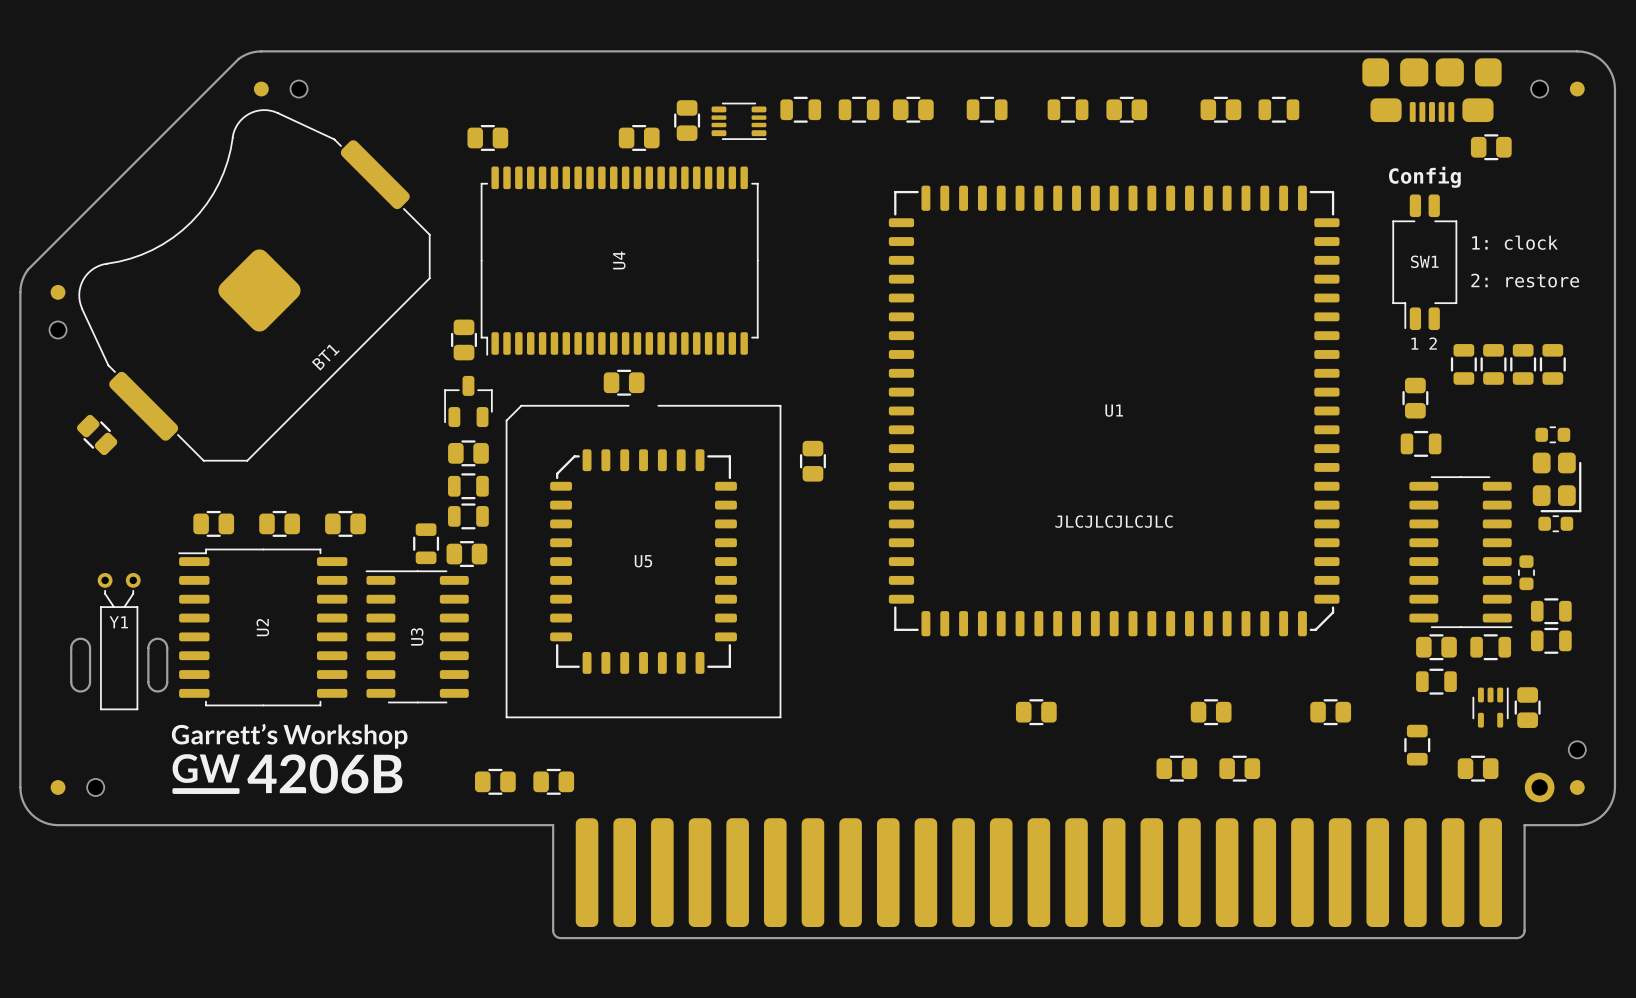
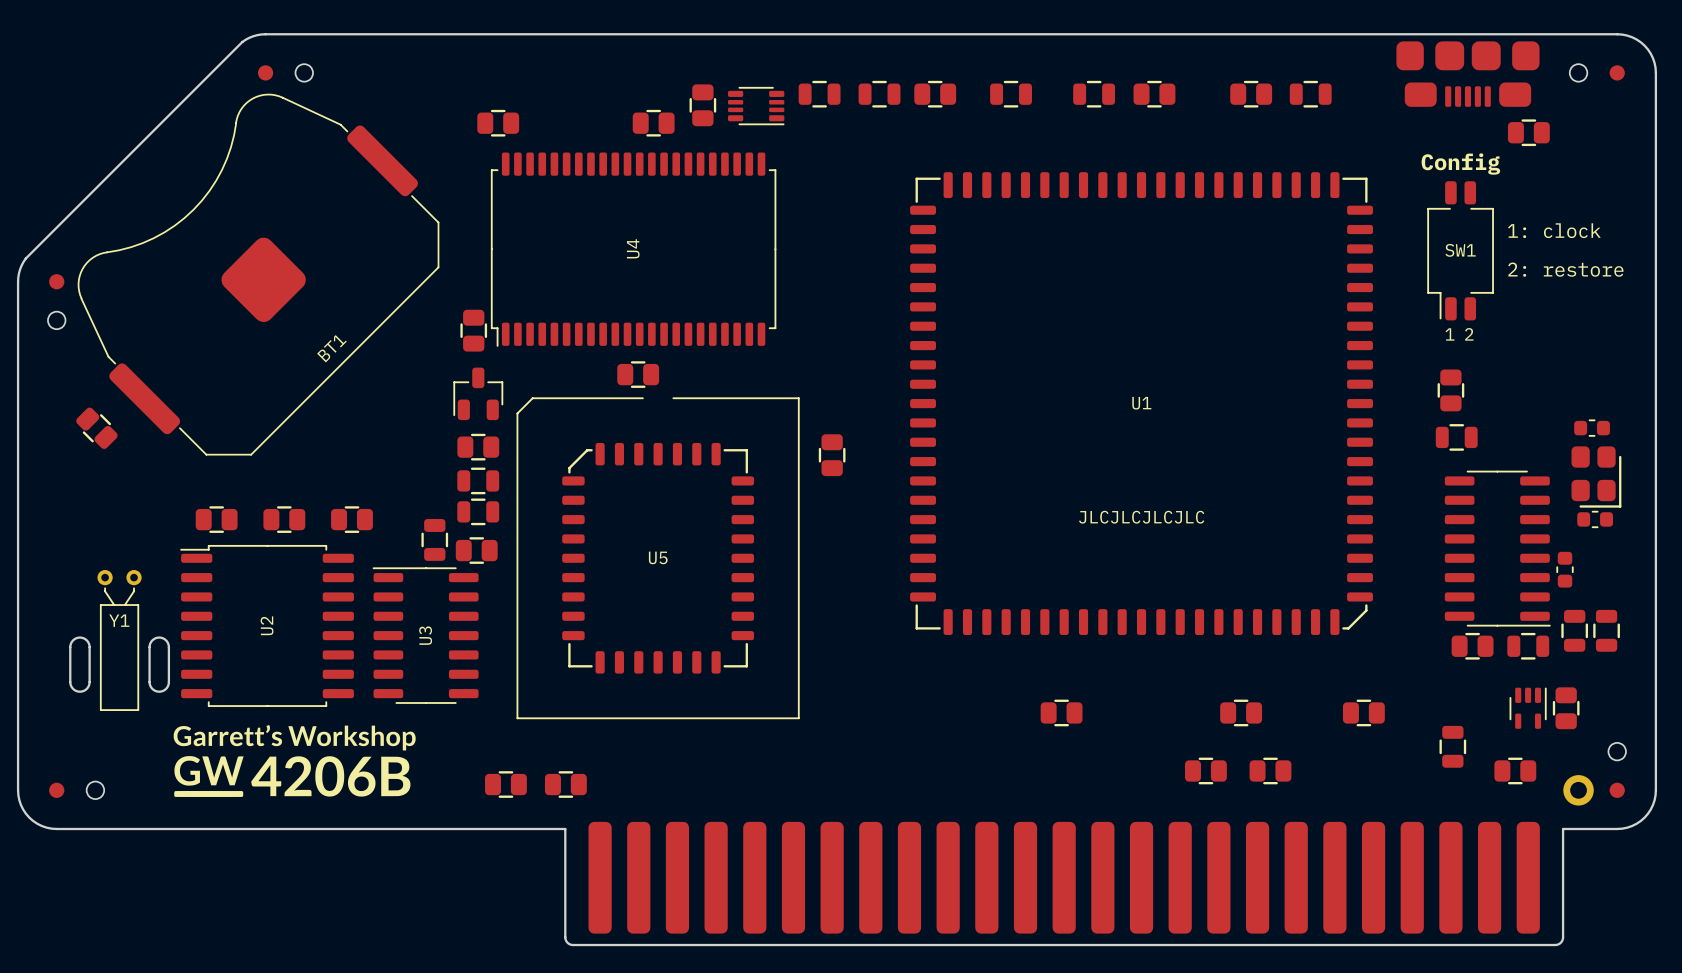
part: (1463, 364) -> none
part: (1493, 364) -> none
part: (1523, 364) -> none
part: (1552, 364) -> none
part: (1551, 611) -> none
part: none -> (1574, 630)
part: none -> (1606, 630)
part: (1551, 640) -> none
part: (1436, 681) -> none

